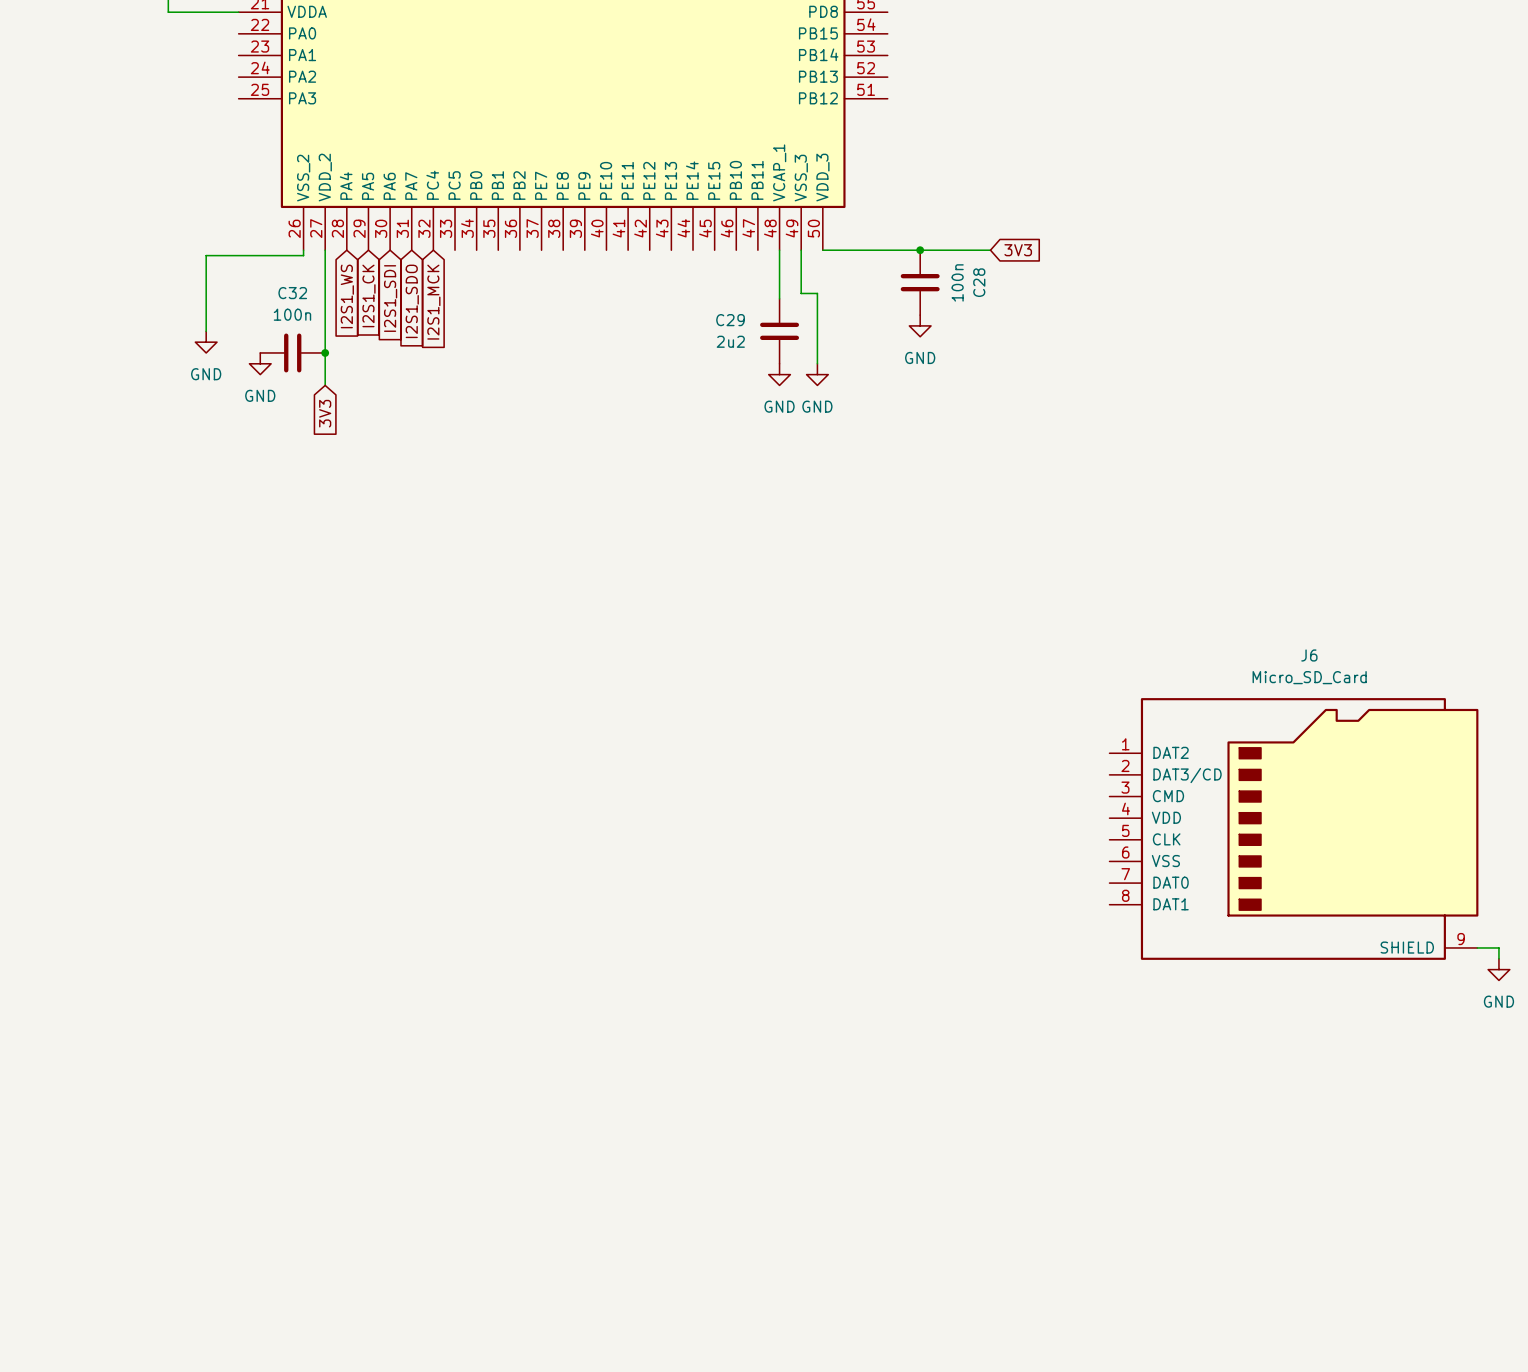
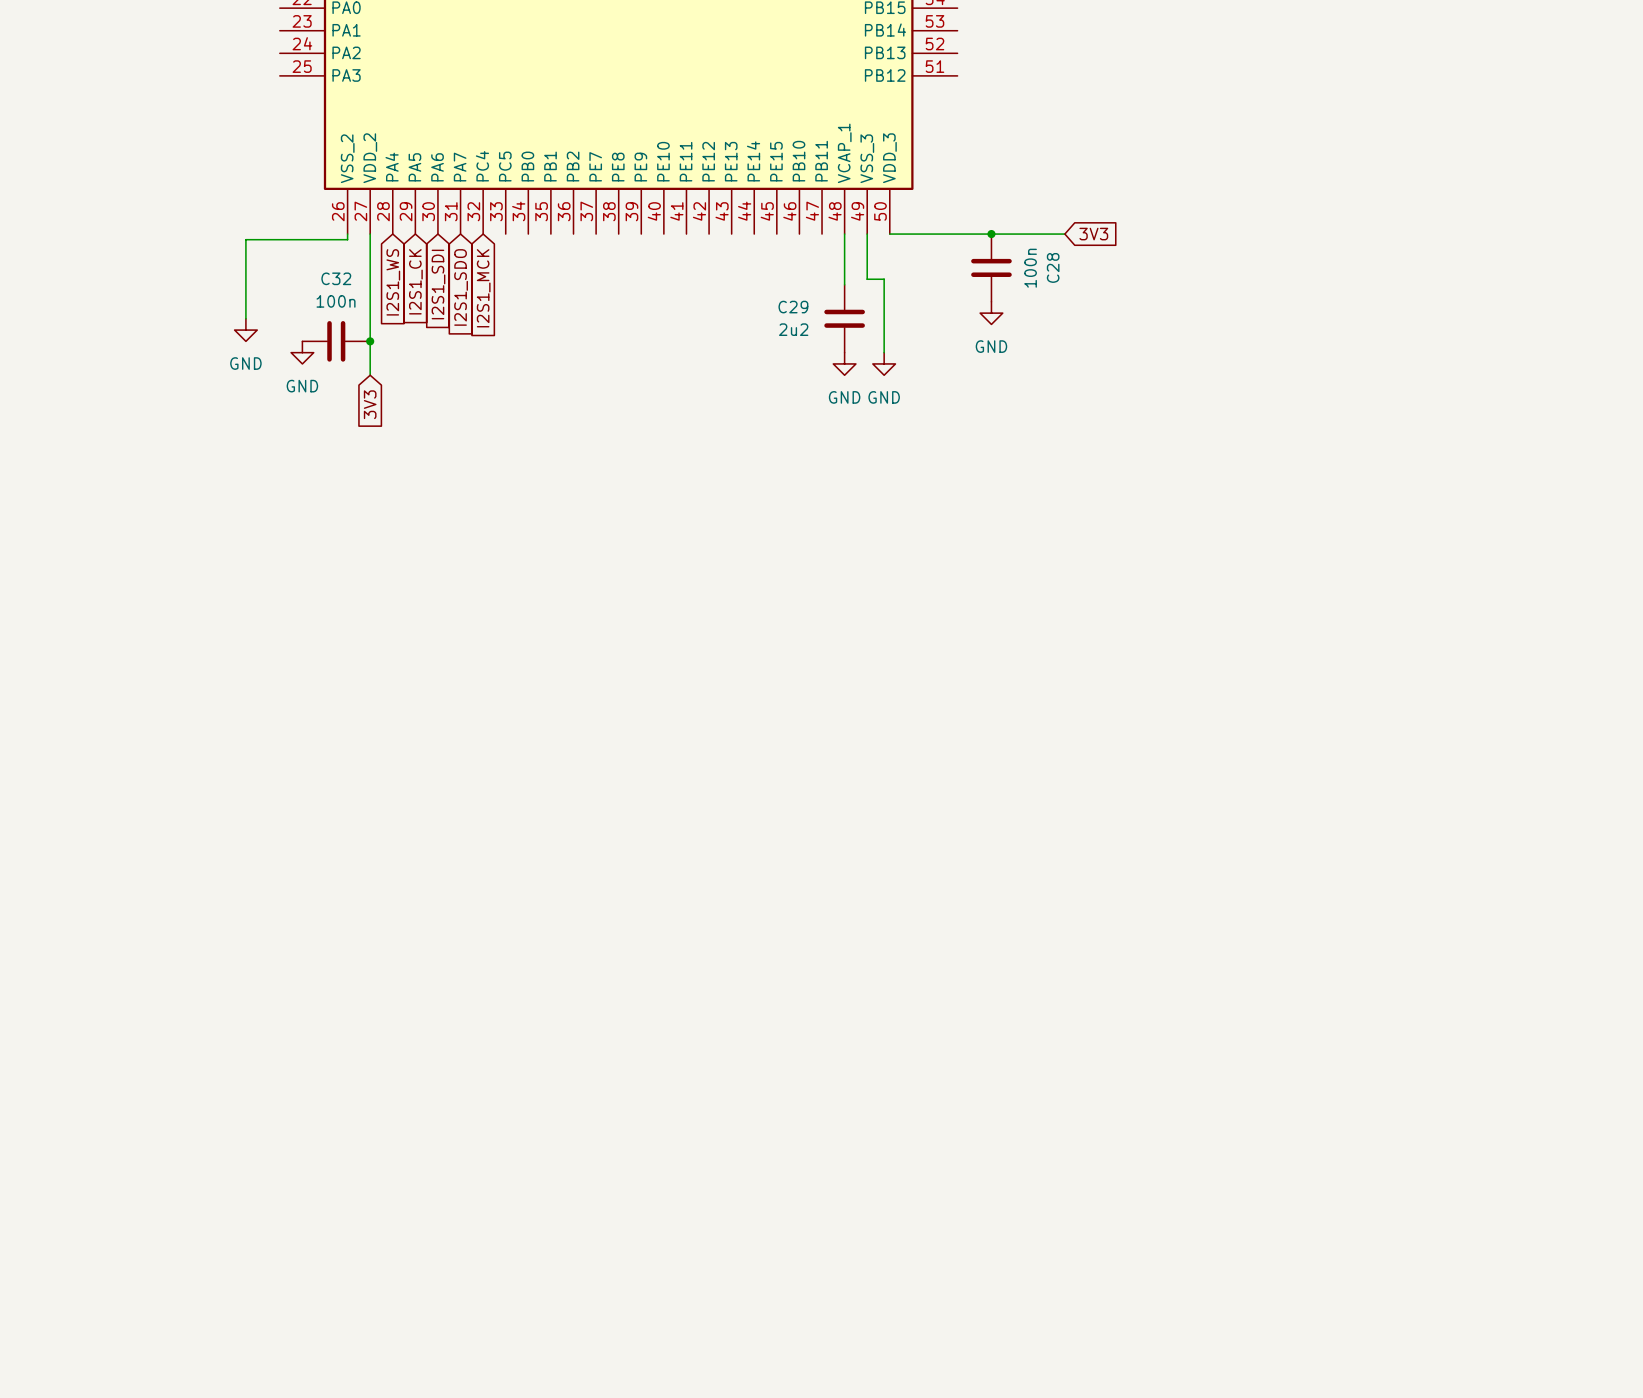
J6: Micro_SD_Card (1293, 828) -> none
wire: (1477, 947) (1498, 947) (1498, 958) -> none
power symbol: GND (1498, 969) -> none

